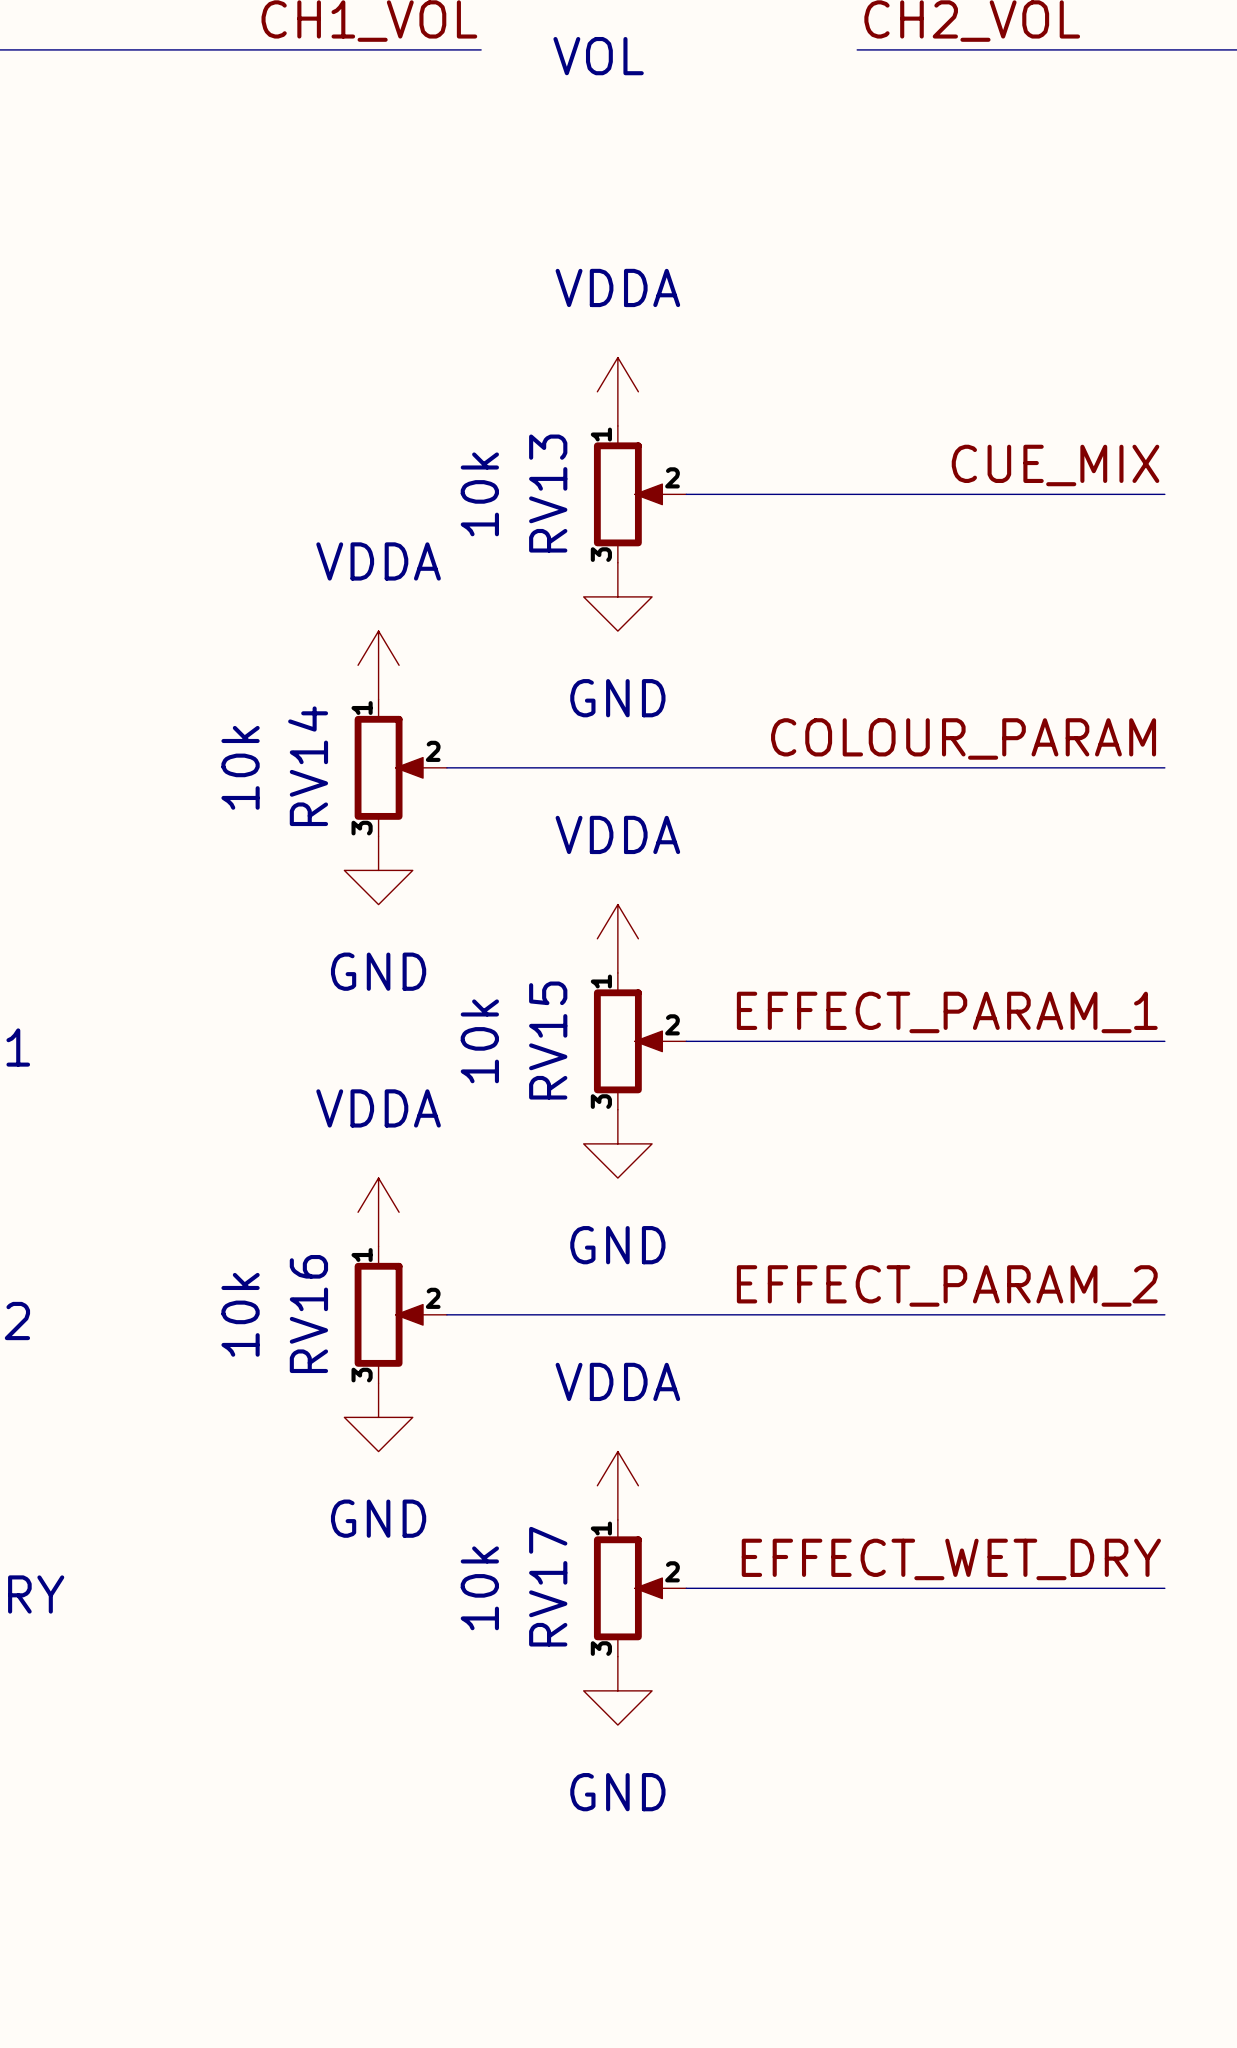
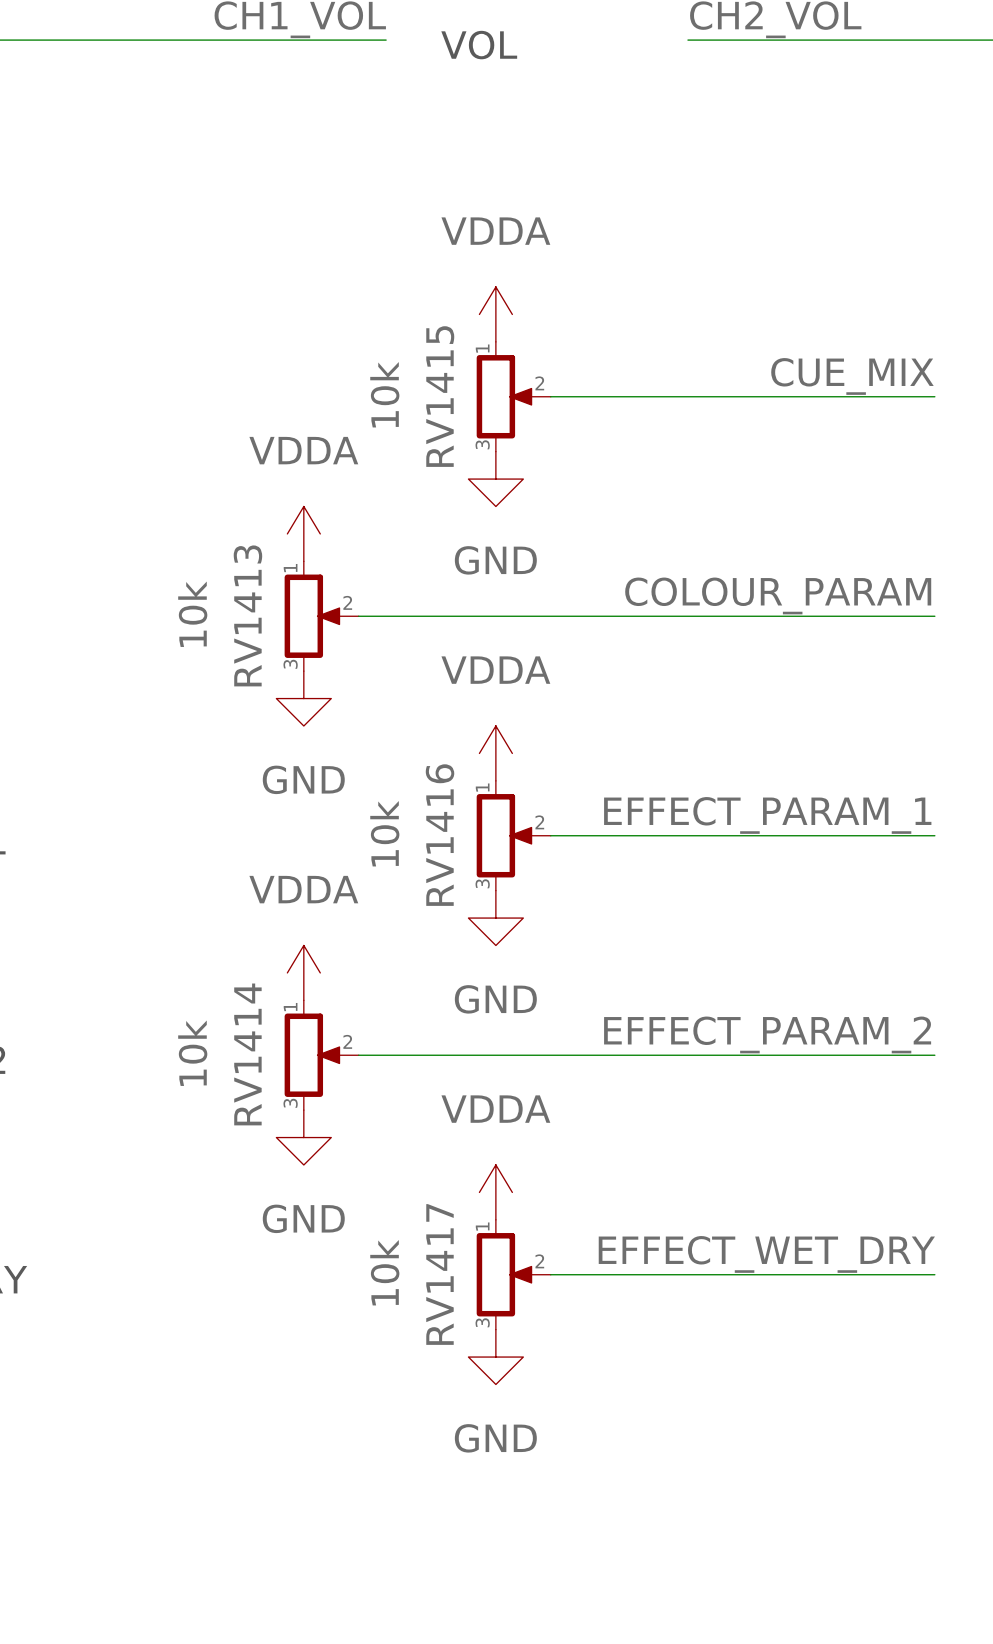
RV13 name: RV13 (548, 493) -> RV1415 (440, 396)
RV14 name: RV14 (308, 766) -> RV1413 (247, 615)
RV15 name: RV15 (548, 1040) -> RV1416 (440, 835)
RV16 name: RV16 (308, 1314) -> RV1414 (247, 1054)
RV17 name: RV17 (548, 1586) -> RV1417 (439, 1274)

